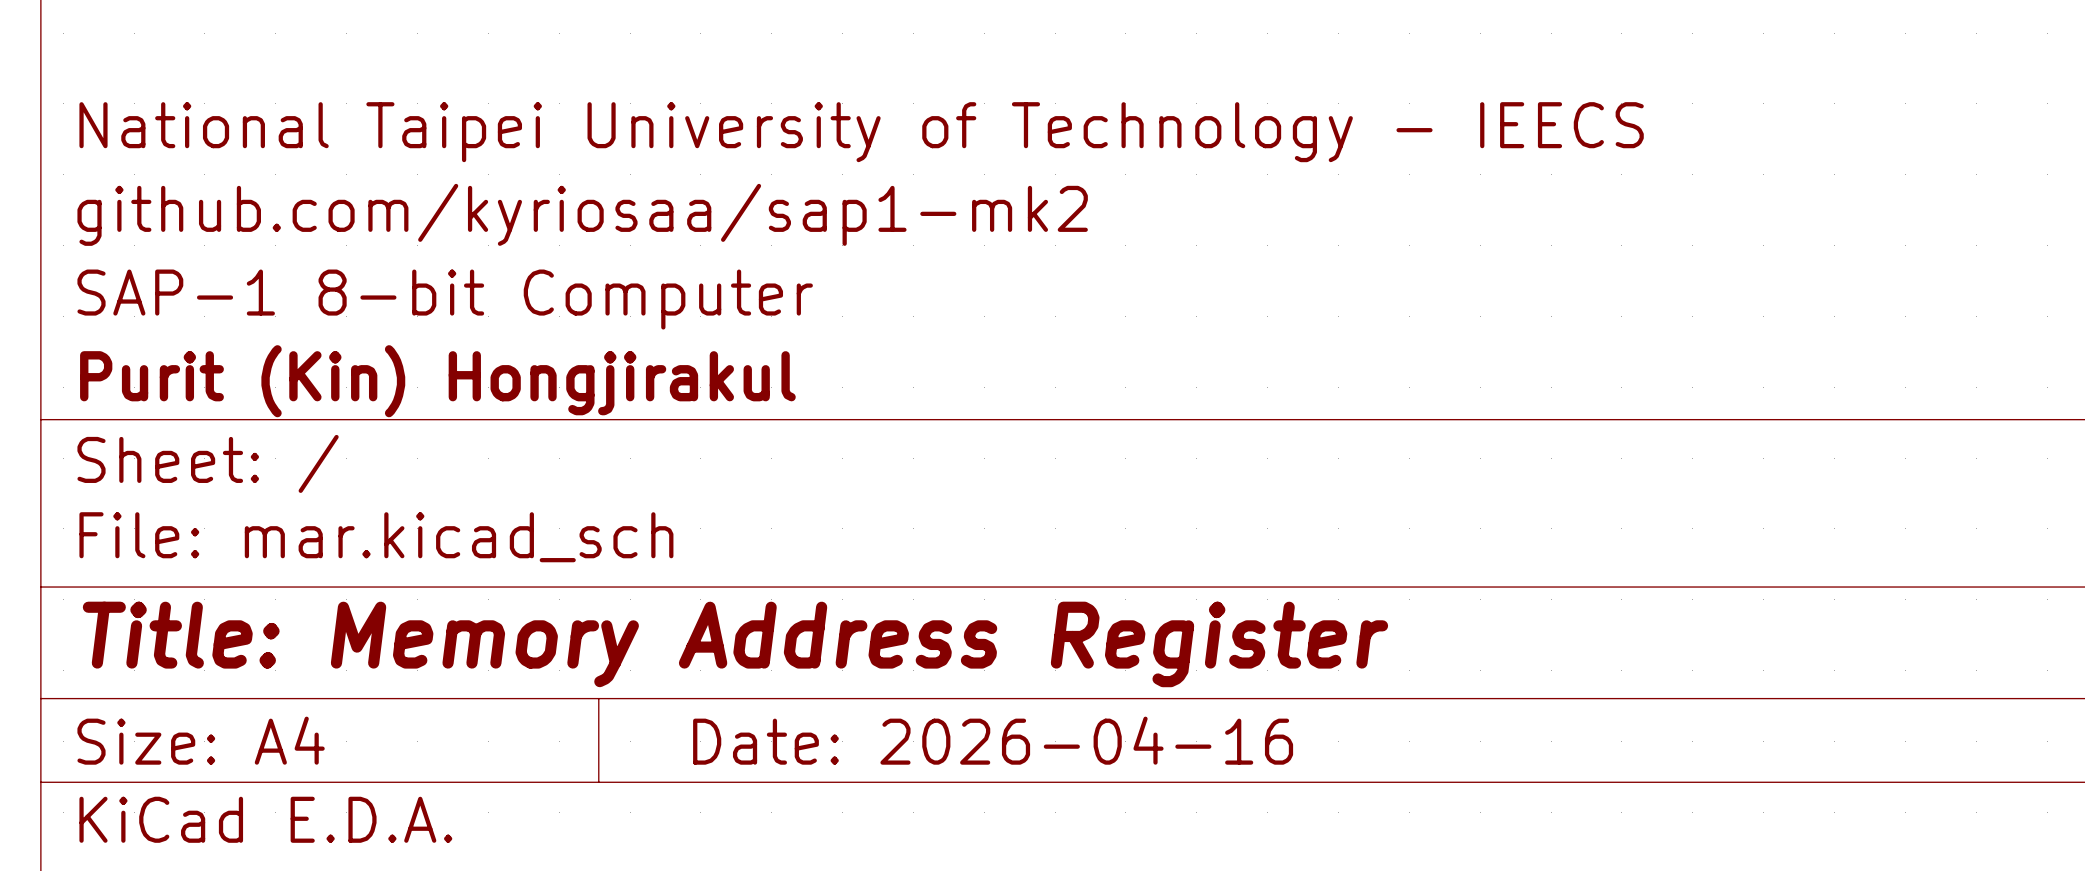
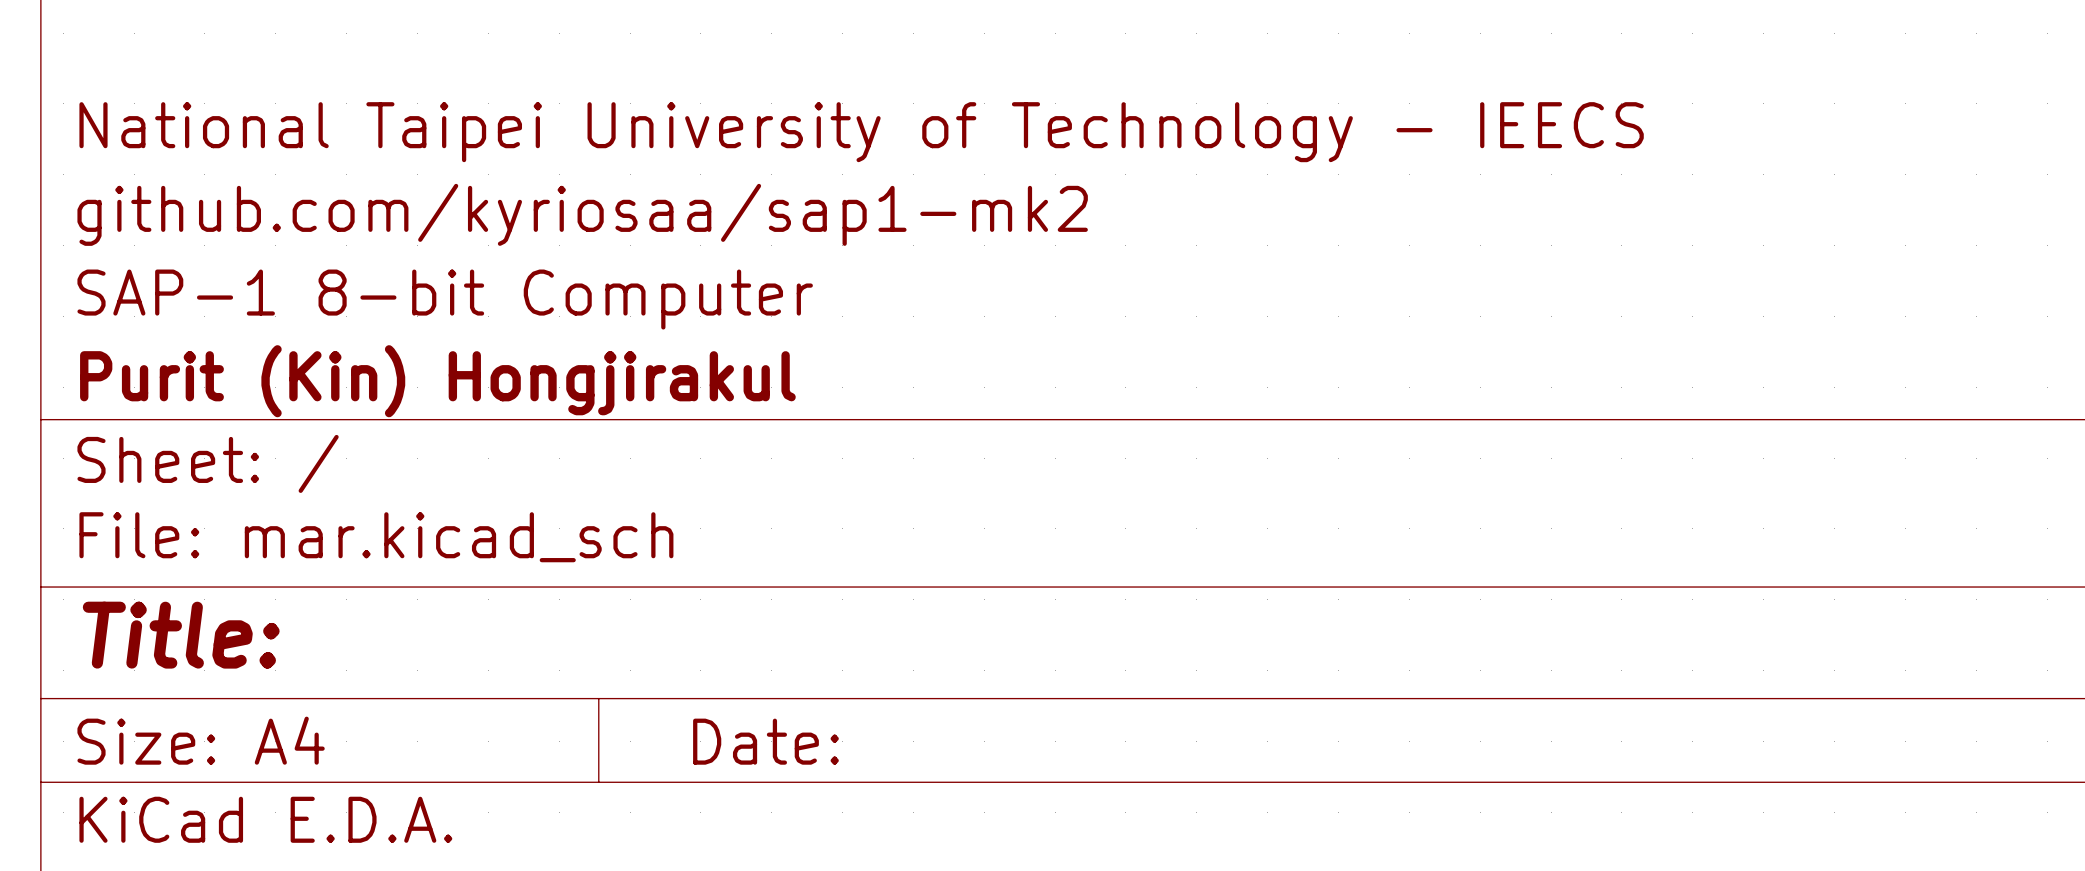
title block: Title: Memory Address Register (735, 644) -> Title: (181, 635)
title block: Date: 2026-04-16 (993, 740) -> Date: (765, 741)

